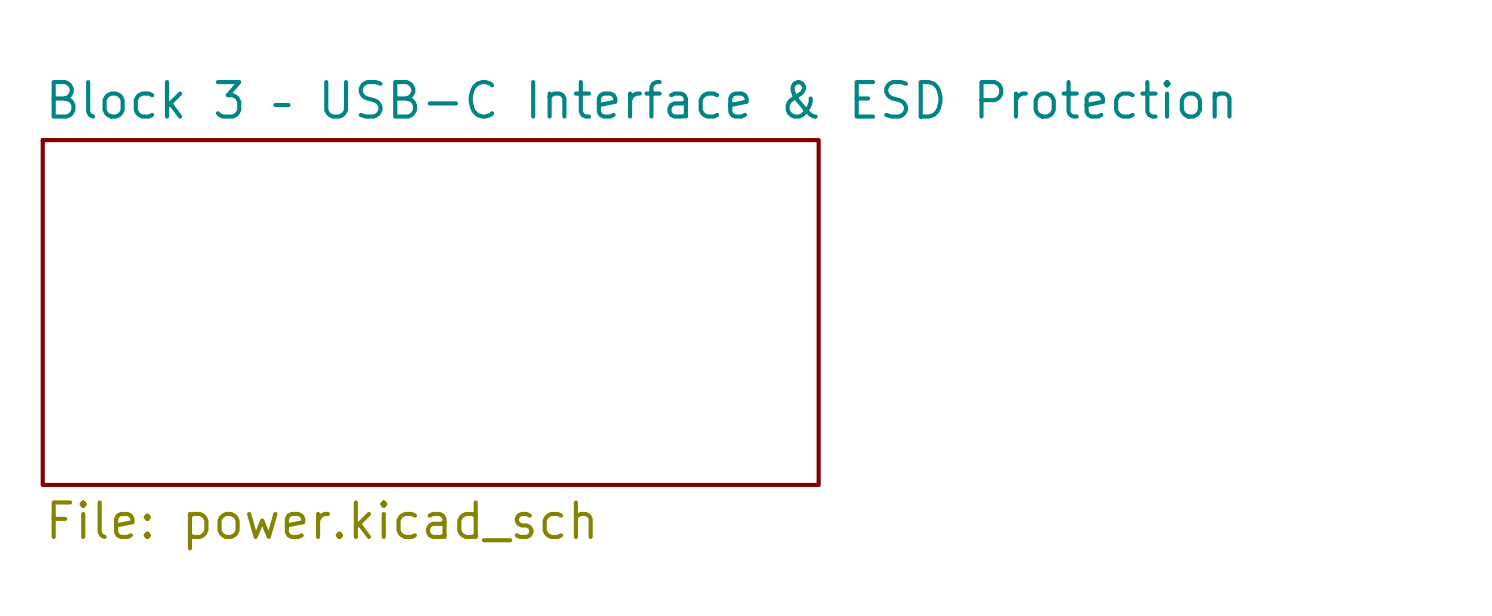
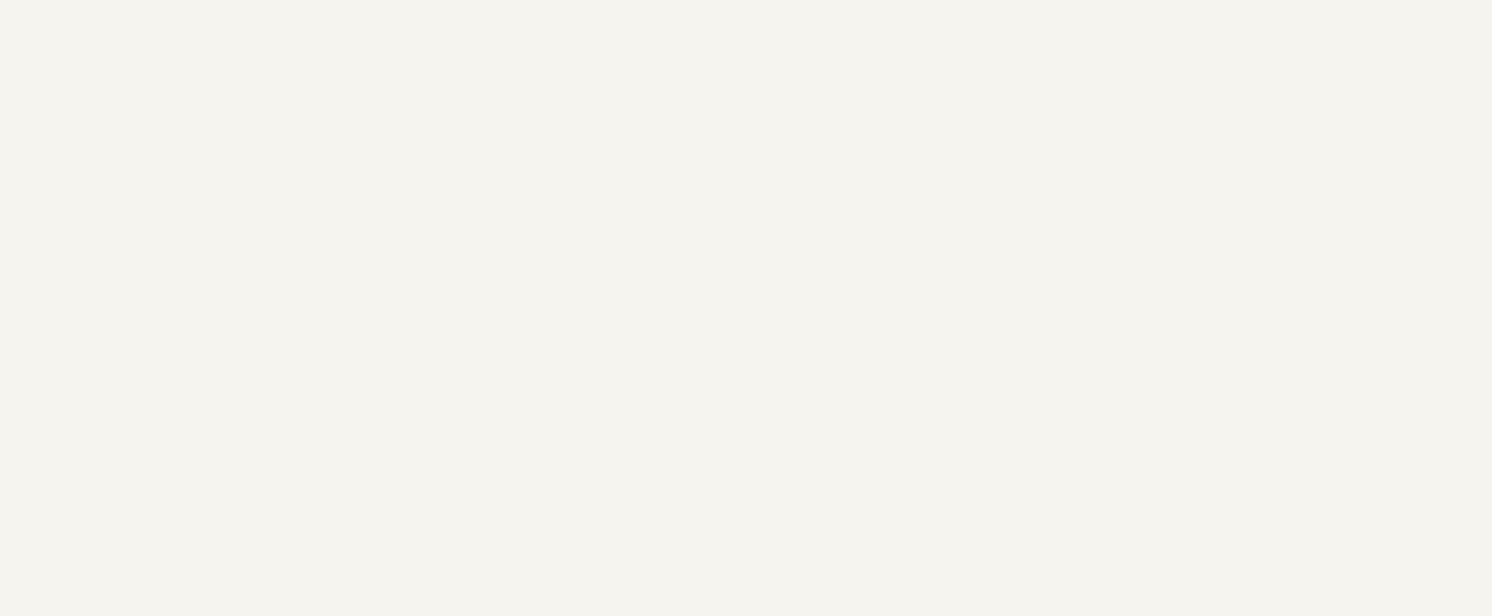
sheet Block 3 – USB-C Interface & ESD Protection: File: power.kicad_sch (430, 312) -> none

